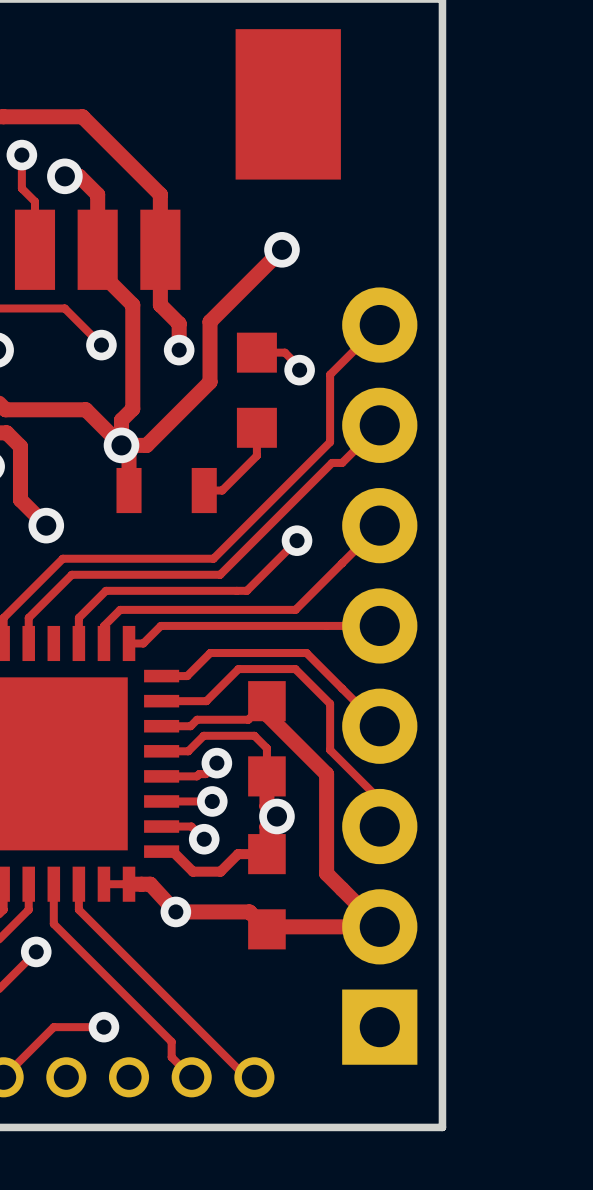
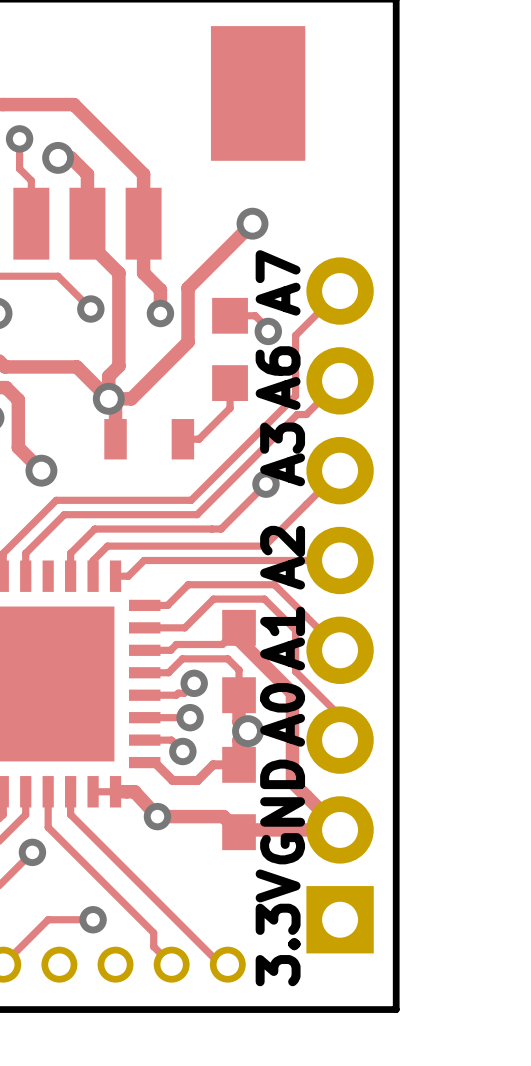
text: none -> A7 (278, 282)
text: none -> A6 (278, 378)
text: none -> A3 (282, 454)
text: none -> A2 (282, 557)
text: none -> A1 (282, 638)
text: none -> A0 (282, 714)
text: none -> GND (282, 811)
text: none -> 3.3V (278, 927)

